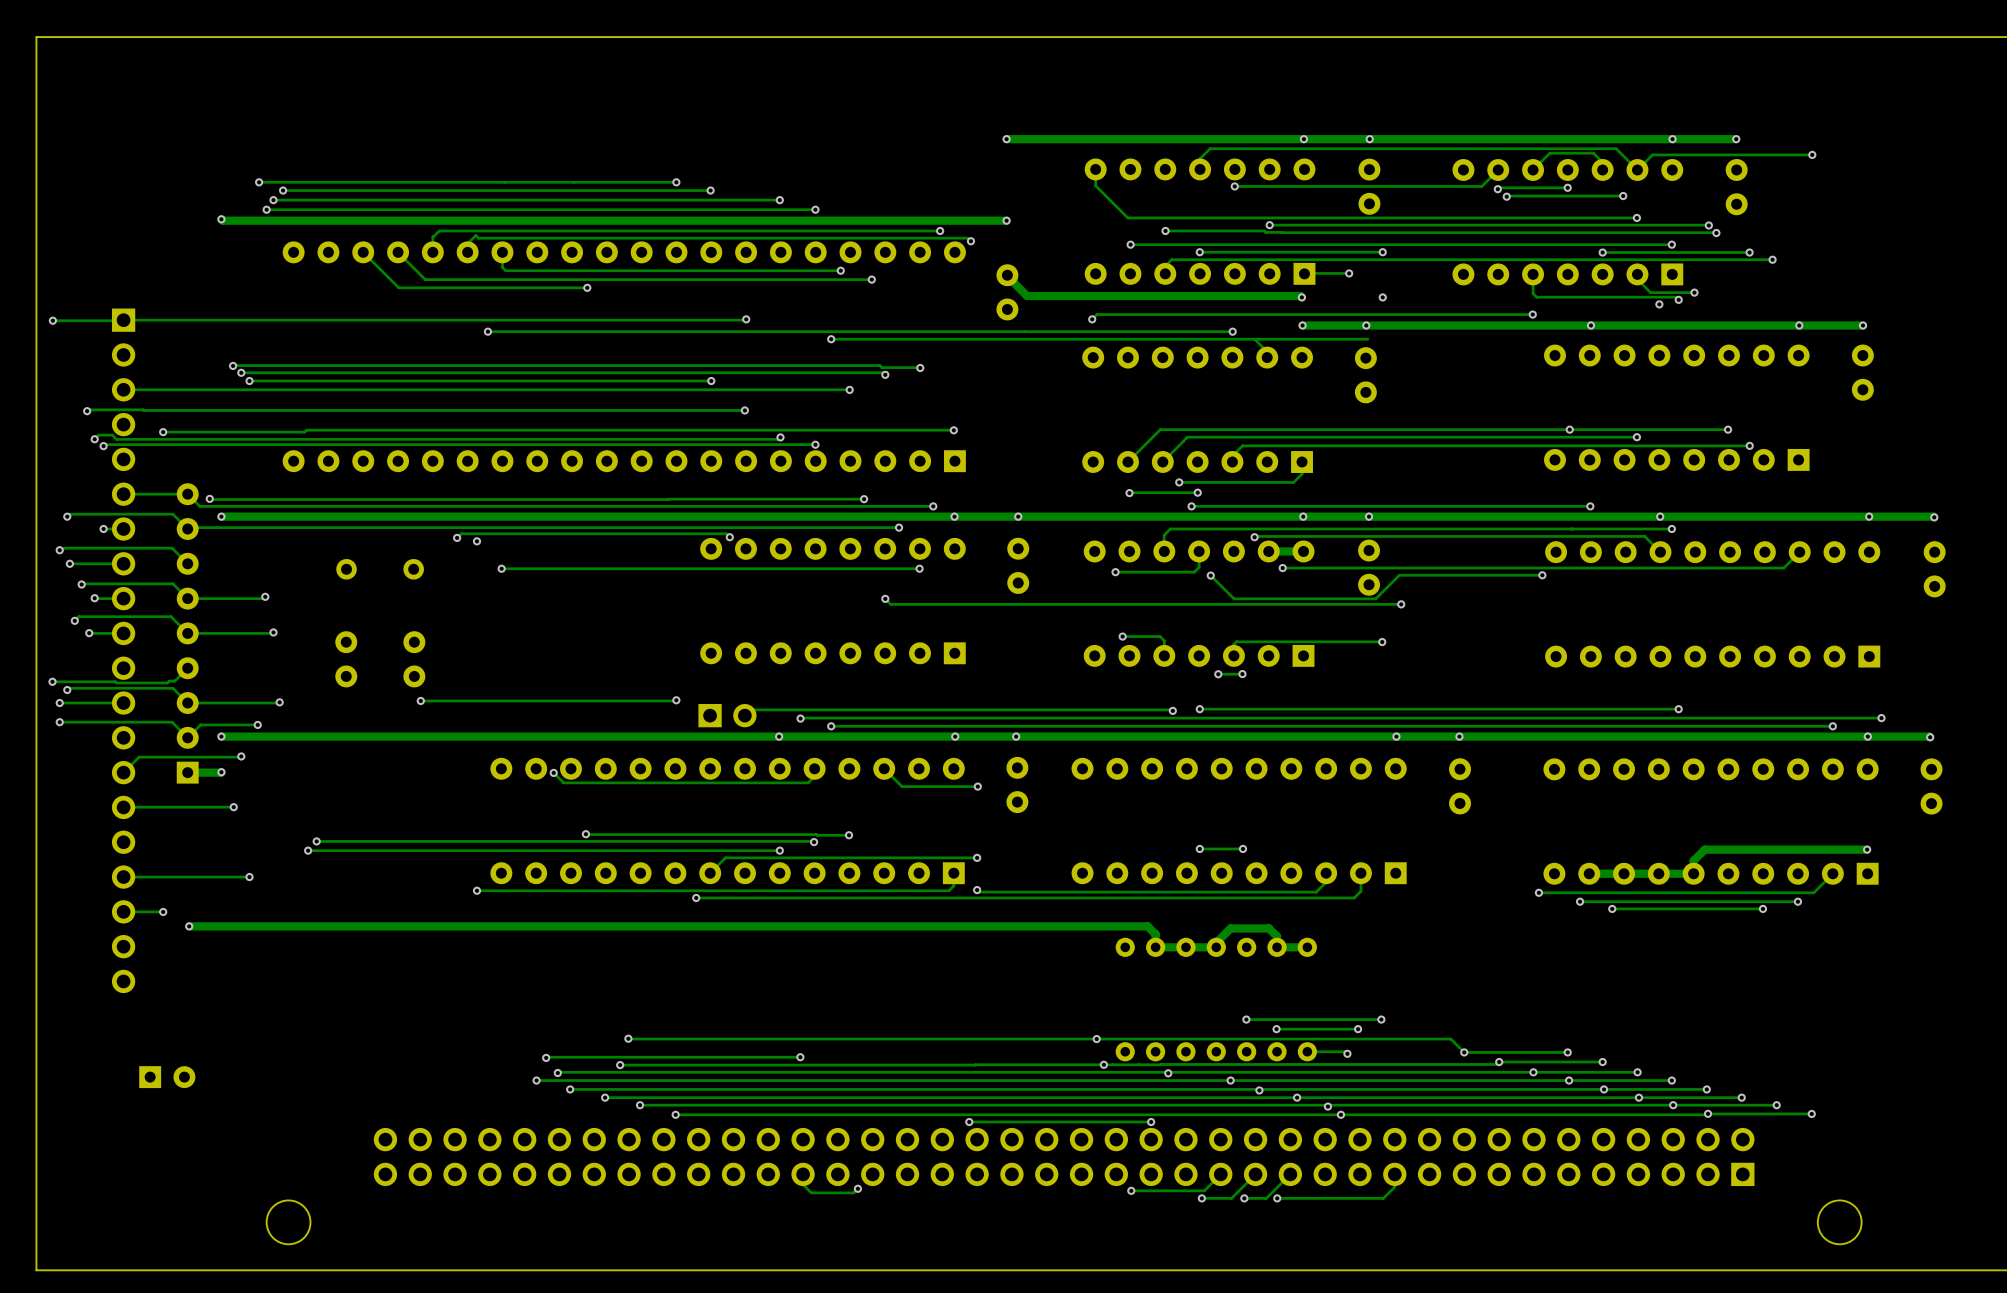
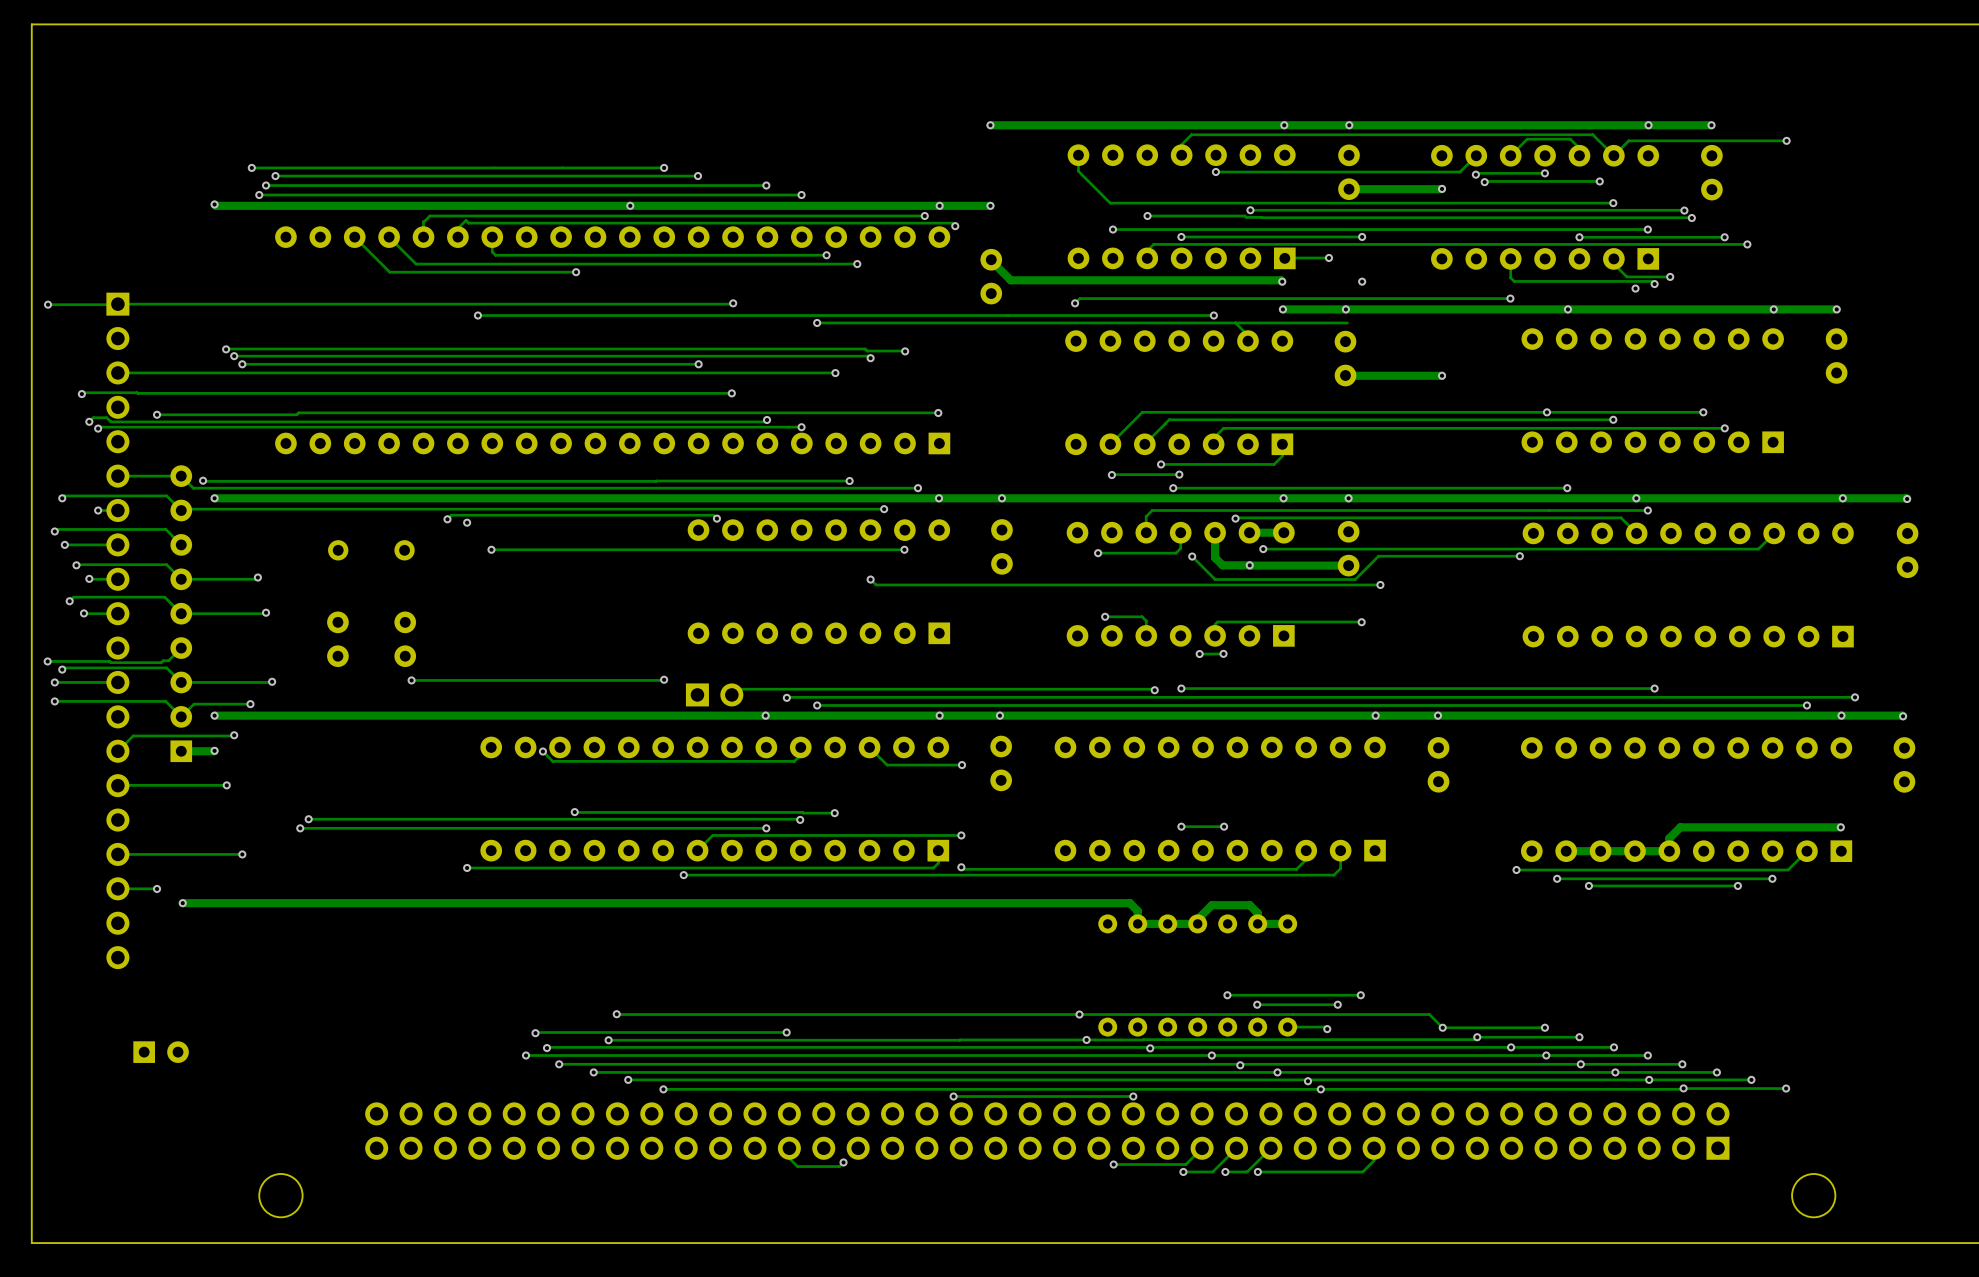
track: none -> (1442, 188) (1349, 189)
via: none -> (1442, 188)
via: none -> (630, 205)
via: none -> (939, 205)
track: none -> (1345, 375) (1442, 375)
via: none -> (1442, 375)
track: none -> (1215, 532) (1215, 557) (1222, 565) (1348, 565)
via: none -> (1249, 565)

